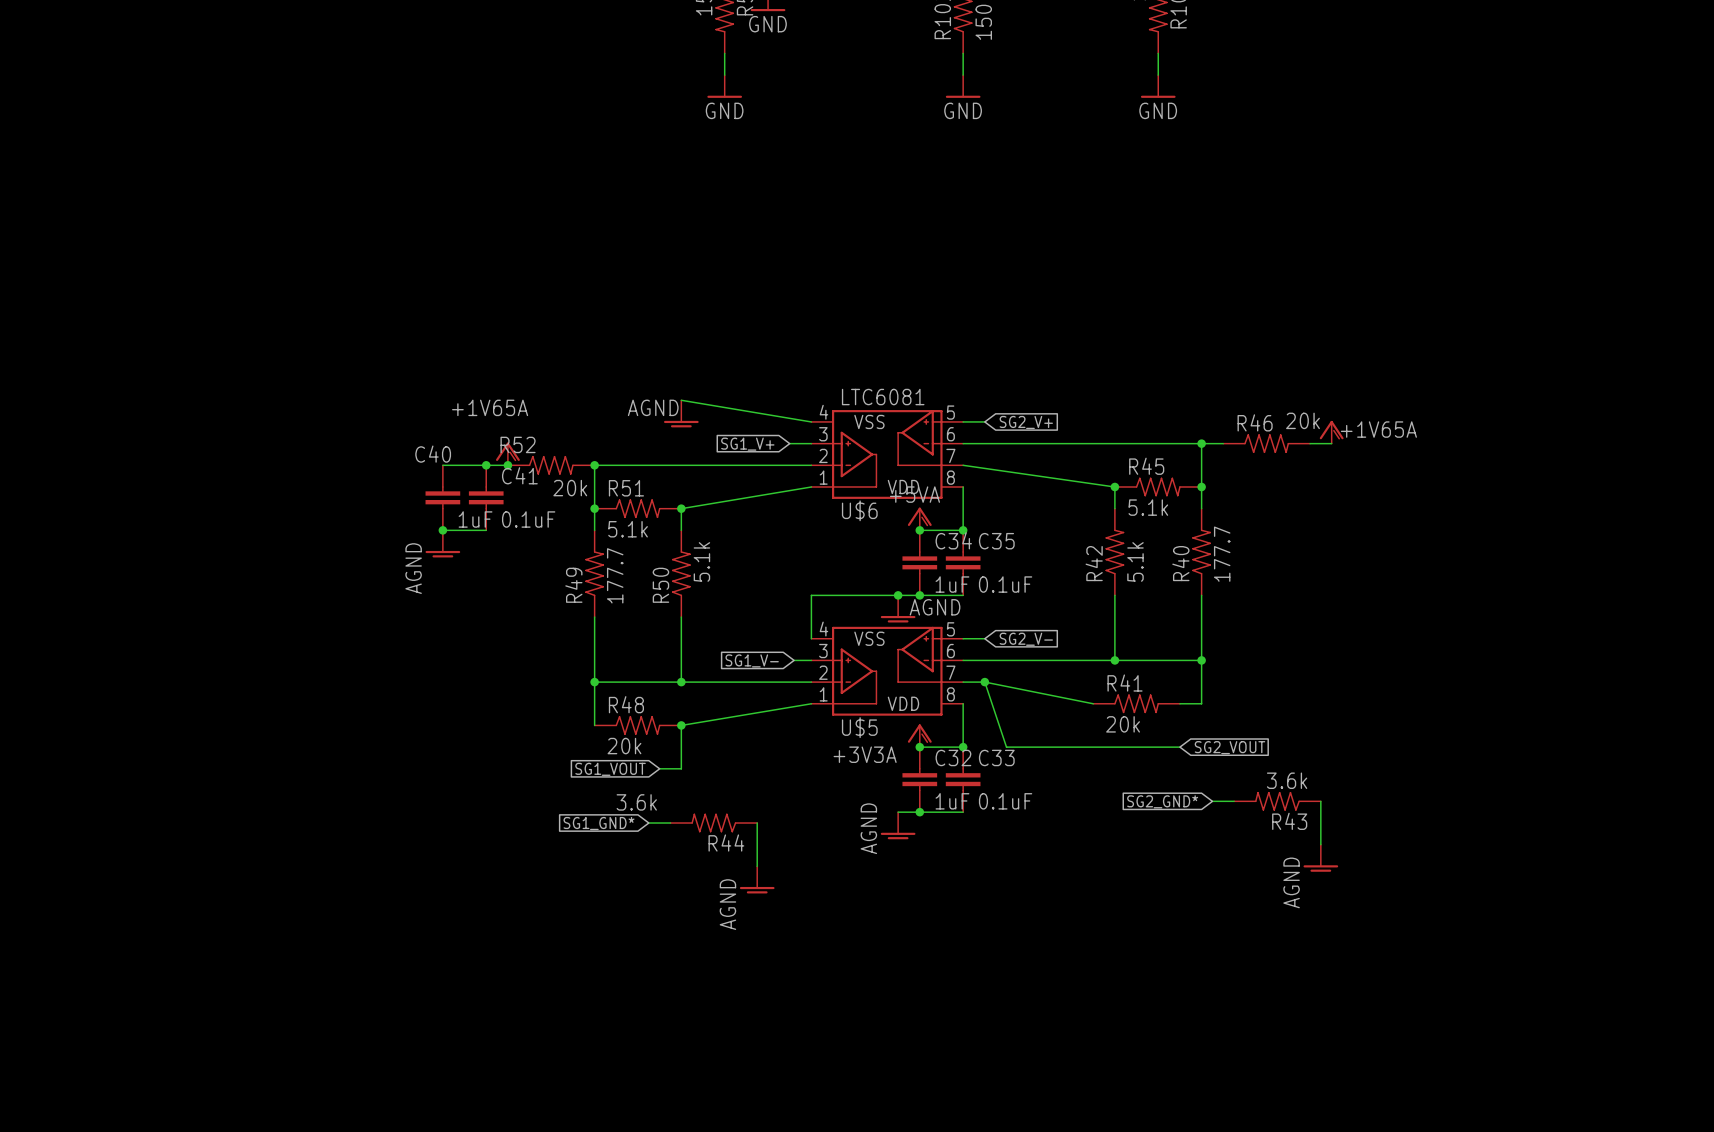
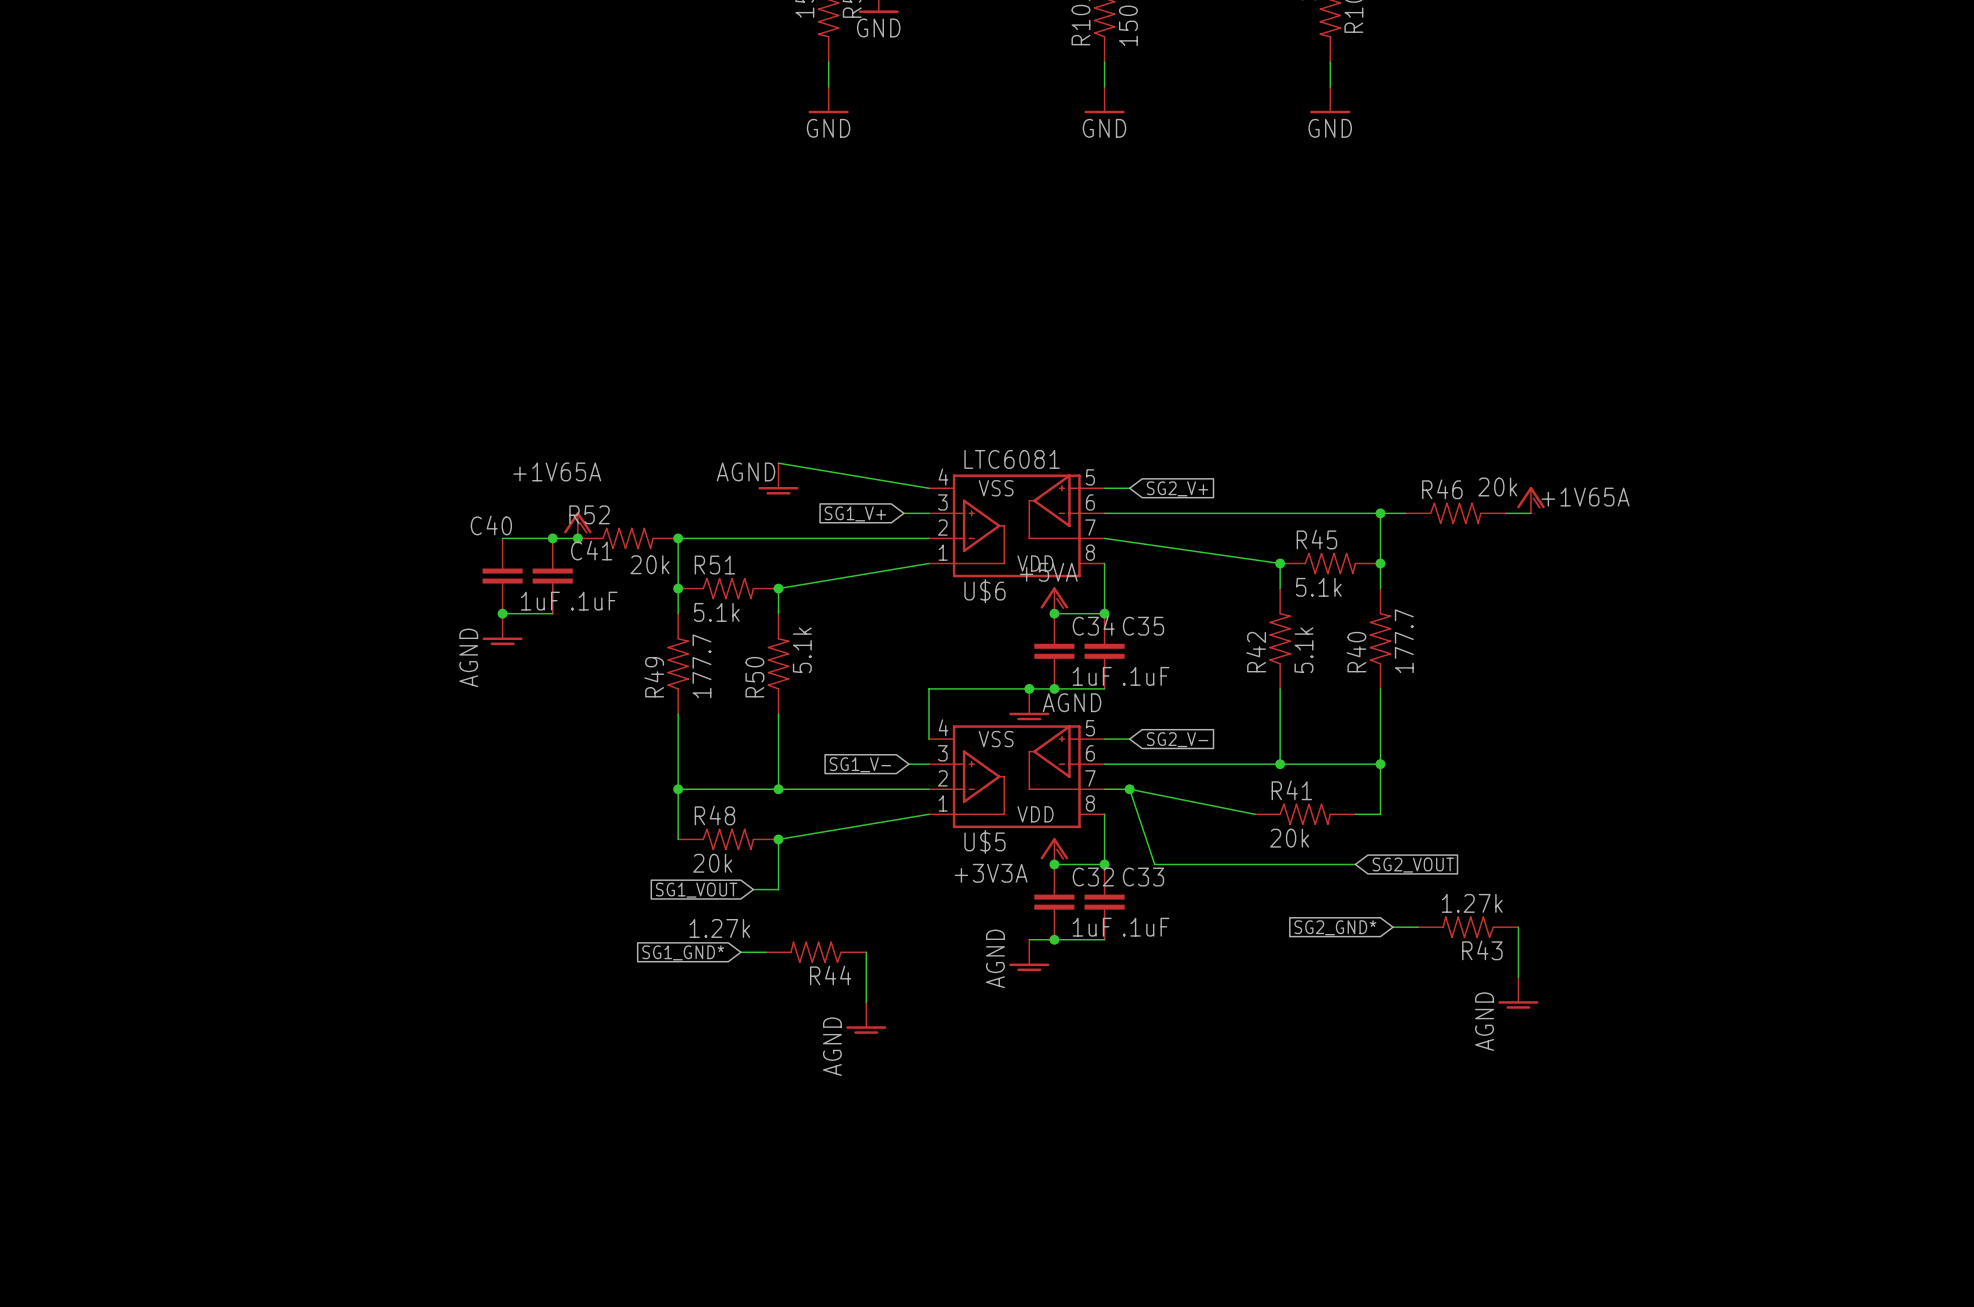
C41 value: 0.1uF (528, 519) -> .1uF (594, 601)
C35 value: 0.1uF (1005, 584) -> .1uF (1146, 676)
R43 value: 3.6k (1287, 780) -> 1.27k (1472, 903)
C33 value: 0.1uF (1005, 801) -> .1uF (1146, 927)
R44 value: 3.6k (636, 802) -> 1.27k (719, 928)

